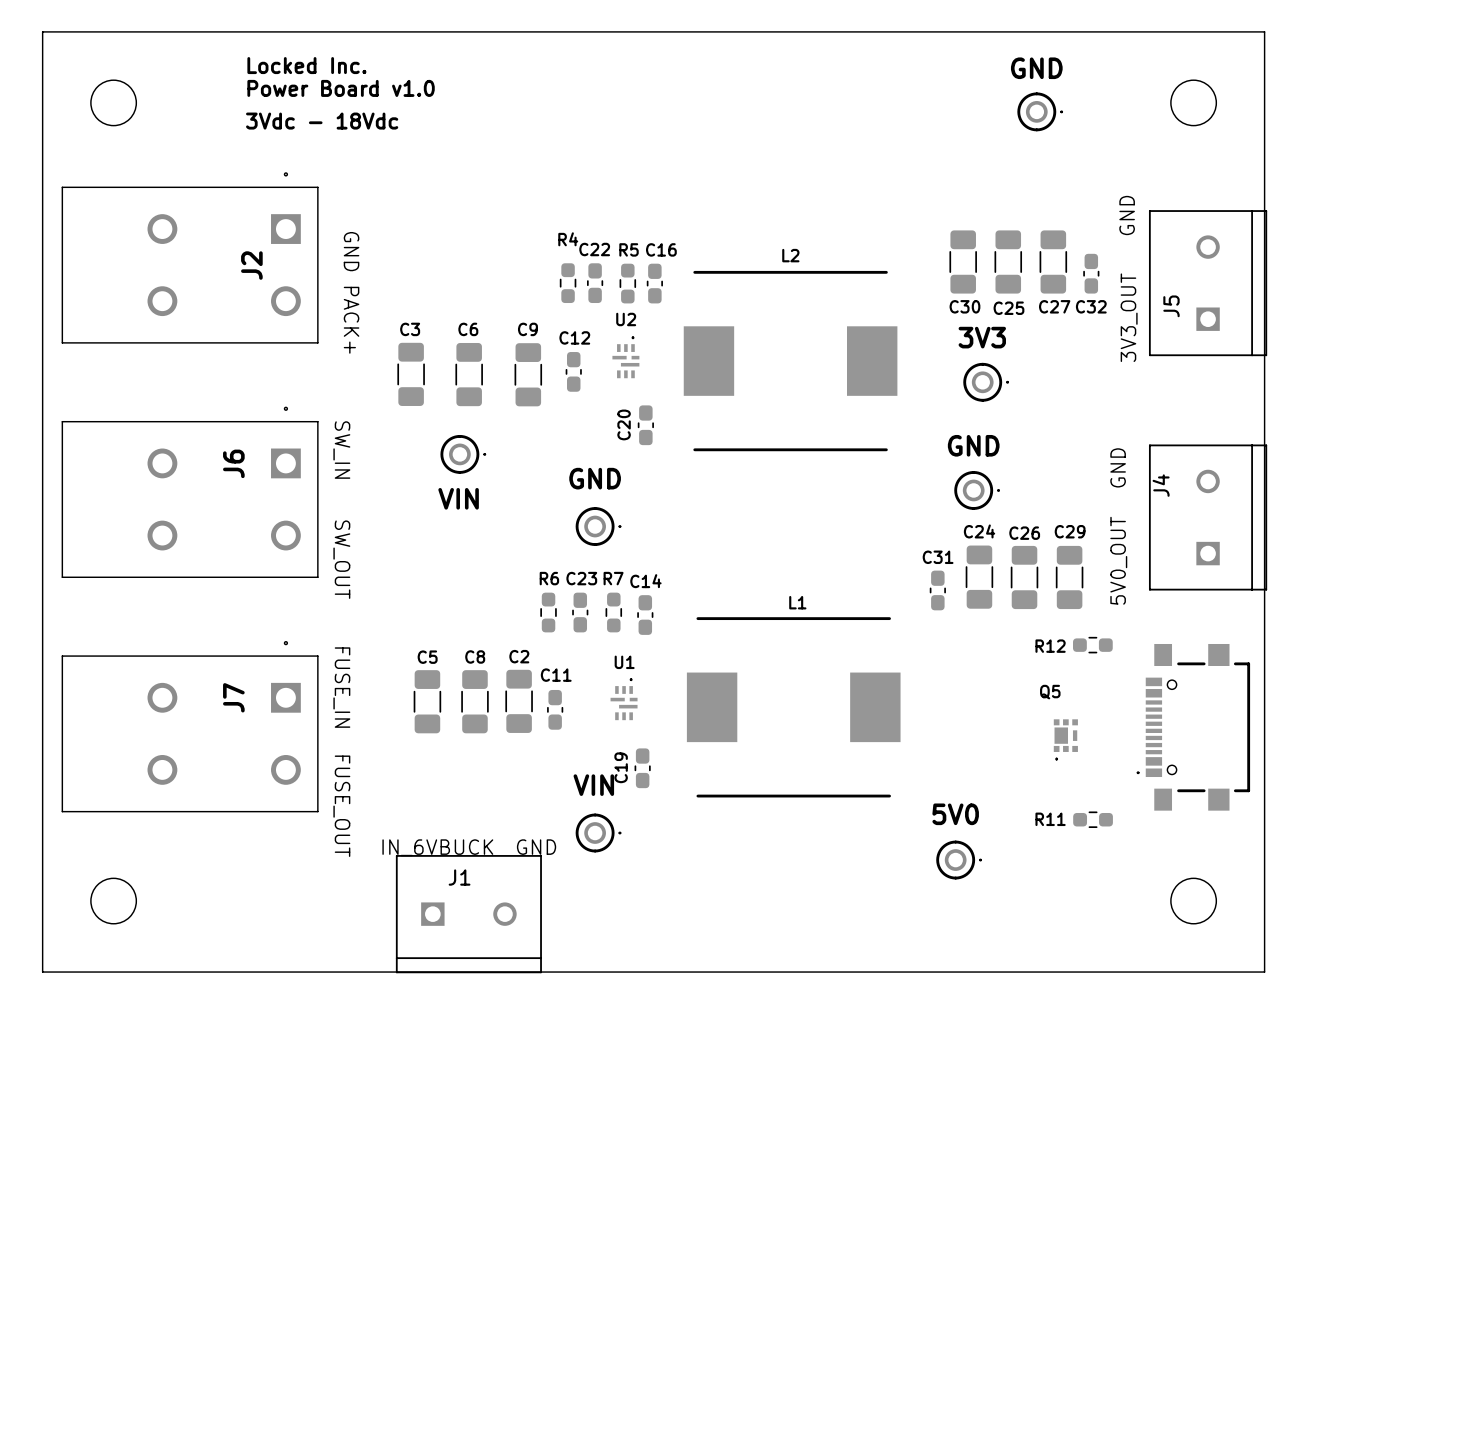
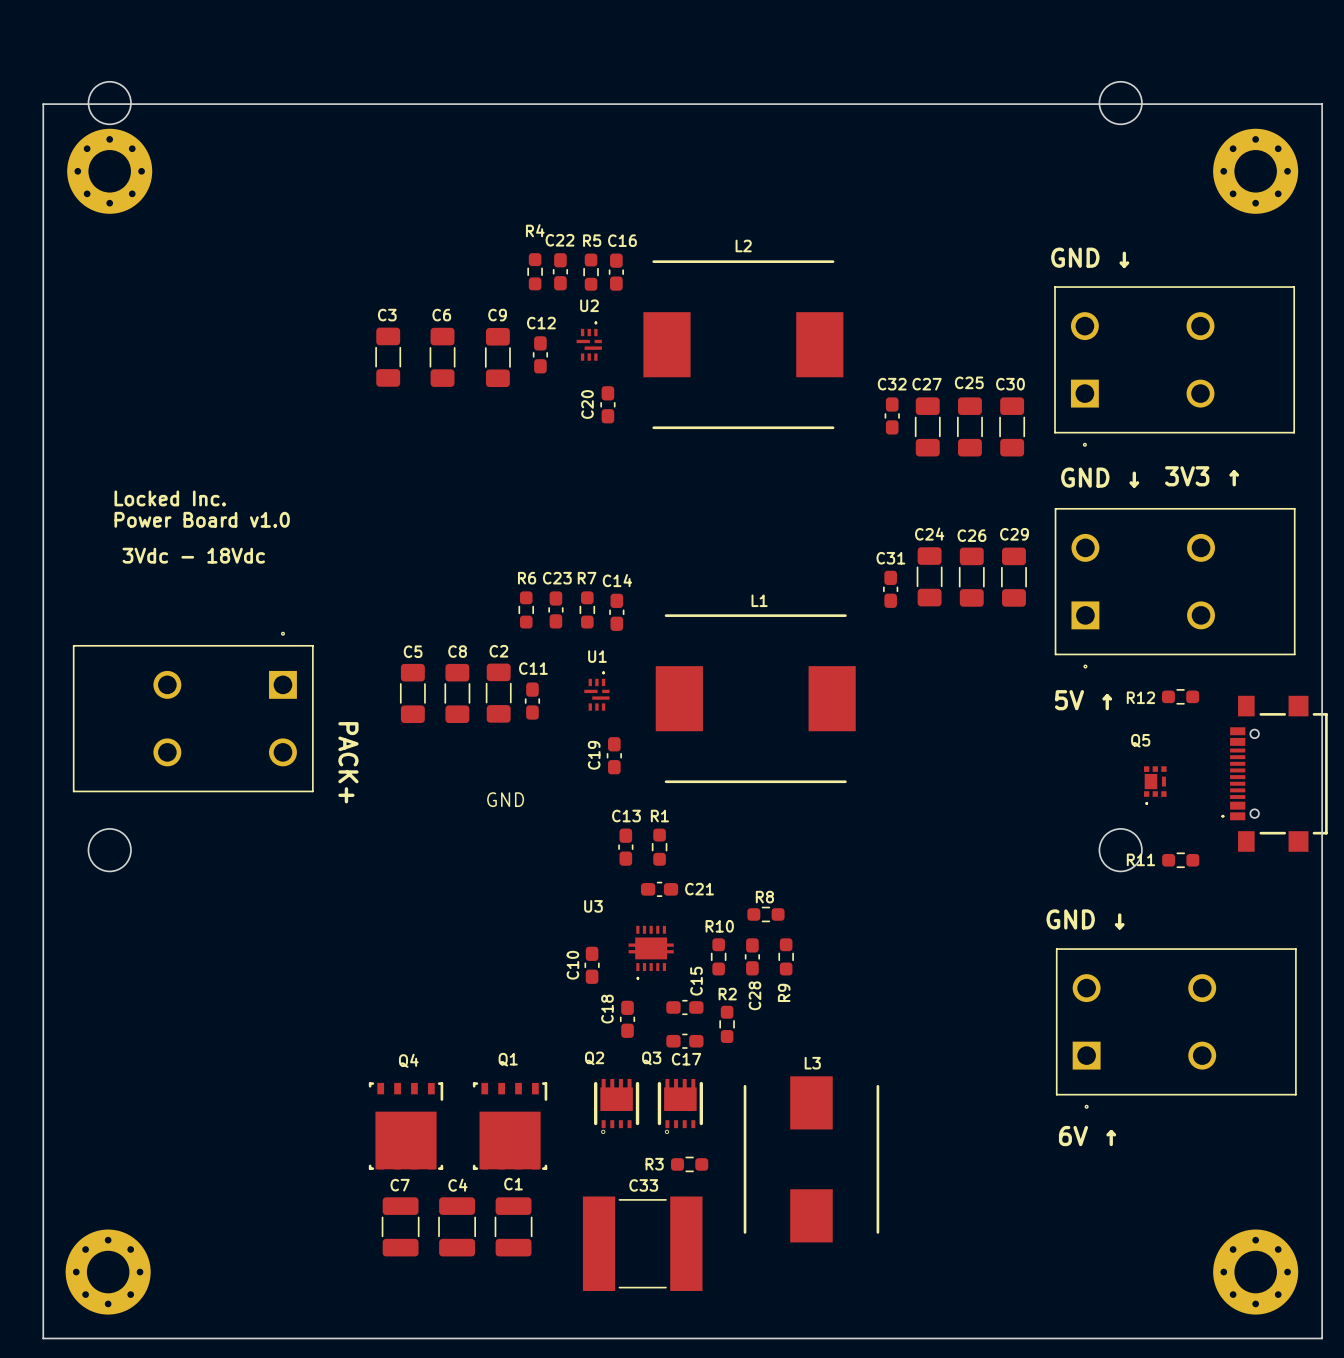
text: Locked Inc. (306, 65) -> none
text: Power Board v1.0 (341, 88) -> none
board edge: (42, 104) (42, 31) (1264, 31) (1264, 972) (42, 972) -> (43, 104) (1322, 104) (1322, 1338) (43, 1338) (43, 916)
GND: (1040, 111) -> none
text: 3Vdc - 18Vdc (322, 121) -> none
part: none -> (109, 171)
part: none -> (1255, 171)
text: GND (1127, 215) -> none
text: GND (351, 251) -> none
J2: (190, 257) -> none
C30 position: (963, 261) -> (1012, 426)
C25 position: (1008, 261) -> (969, 426)
C27 position: (1053, 261) -> (927, 426)
text: none -> GND ↓ (1090, 257)
C32 position: (1091, 273) -> (892, 415)
J5: (1208, 283) -> none
C30 name position: C30 (964, 306) -> C30 (1010, 384)
C27 name position: C27 (1054, 306) -> C27 (927, 384)
C32 name position: C32 (1091, 306) -> C32 (892, 384)
C25 name position: C25 (1008, 308) -> C25 (969, 382)
text: 3V3_OUT (1129, 317) -> none
text: PACK+ (351, 320) -> none
3V3: (986, 382) -> none
part: none -> (1174, 366)
text: SW_IN (341, 450) -> none
VIN: (463, 454) -> none
text: GND (1118, 467) -> GND ↓ (1100, 477)
GND: (977, 490) -> none
J6: (190, 492) -> none
text: none -> 3V3 ↑ (1202, 476)
J4: (1208, 517) -> none
text: none -> Locked Inc. (170, 498)
GND: (598, 526) -> none
text: none -> Power Board v1.0 (202, 519)
text: SW_OUT (341, 559) -> none
text: 5V0_OUT (1118, 560) -> none
C24 position: (979, 577) -> (929, 576)
C26 position: (1024, 577) -> (971, 577)
C29 position: (1069, 577) -> (1013, 577)
text: none -> 3Vdc - 18Vdc (193, 555)
C31 position: (937, 590) -> (890, 589)
R6 position: (548, 612) -> (526, 609)
C23 position: (580, 612) -> (555, 609)
R7 position: (613, 612) -> (587, 609)
C14 position: (645, 615) -> (616, 612)
part: none -> (1175, 588)
R12 position: (1092, 645) -> (1180, 696)
text: FUSE_IN (341, 687) -> none
U1 position: (624, 699) -> (596, 691)
C5 position: (427, 701) -> (412, 693)
C8 position: (474, 701) -> (457, 693)
C2 position: (519, 701) -> (498, 693)
L1 position: (793, 707) -> (755, 698)
C11 position: (555, 709) -> (532, 701)
J7: (190, 726) -> none
part position: (1193, 727) -> (1274, 773)
Q5 position: (1065, 739) -> (1155, 785)
text: none -> 5V ↑ (1083, 700)
part: none -> (193, 711)
C19 position: (642, 768) -> (614, 755)
text: FUSE_OUT (341, 806) -> none
text: none -> PACK+ (348, 762)
R11 position: (1093, 819) -> (1180, 860)
VIN: (598, 833) -> none
text: IN_6VBUCK (437, 847) -> none
5V0: (959, 860) -> none
C13: none -> (625, 847)
R1: none -> (659, 847)
J1: (468, 914) -> none
C21: none -> (659, 889)
R8: none -> (765, 914)
text: none -> GND ↓ (1085, 919)
U3: none -> (651, 952)
R10: none -> (718, 956)
C28: none -> (752, 956)
R9: none -> (786, 956)
C10: none -> (592, 965)
C15: none -> (684, 1007)
C18: none -> (627, 1019)
R2: none -> (727, 1024)
part: none -> (1176, 1028)
C17: none -> (684, 1041)
Q2: none -> (616, 1106)
Q3: none -> (680, 1106)
Q4: none -> (406, 1126)
Q1: none -> (510, 1126)
text: none -> 6V ↑ (1087, 1136)
L3: none -> (811, 1159)
R3: none -> (689, 1164)
C7: none -> (400, 1226)
C4: none -> (457, 1226)
C1: none -> (513, 1226)
C33: none -> (642, 1243)
part: none -> (108, 1272)
part: none -> (1255, 1272)

